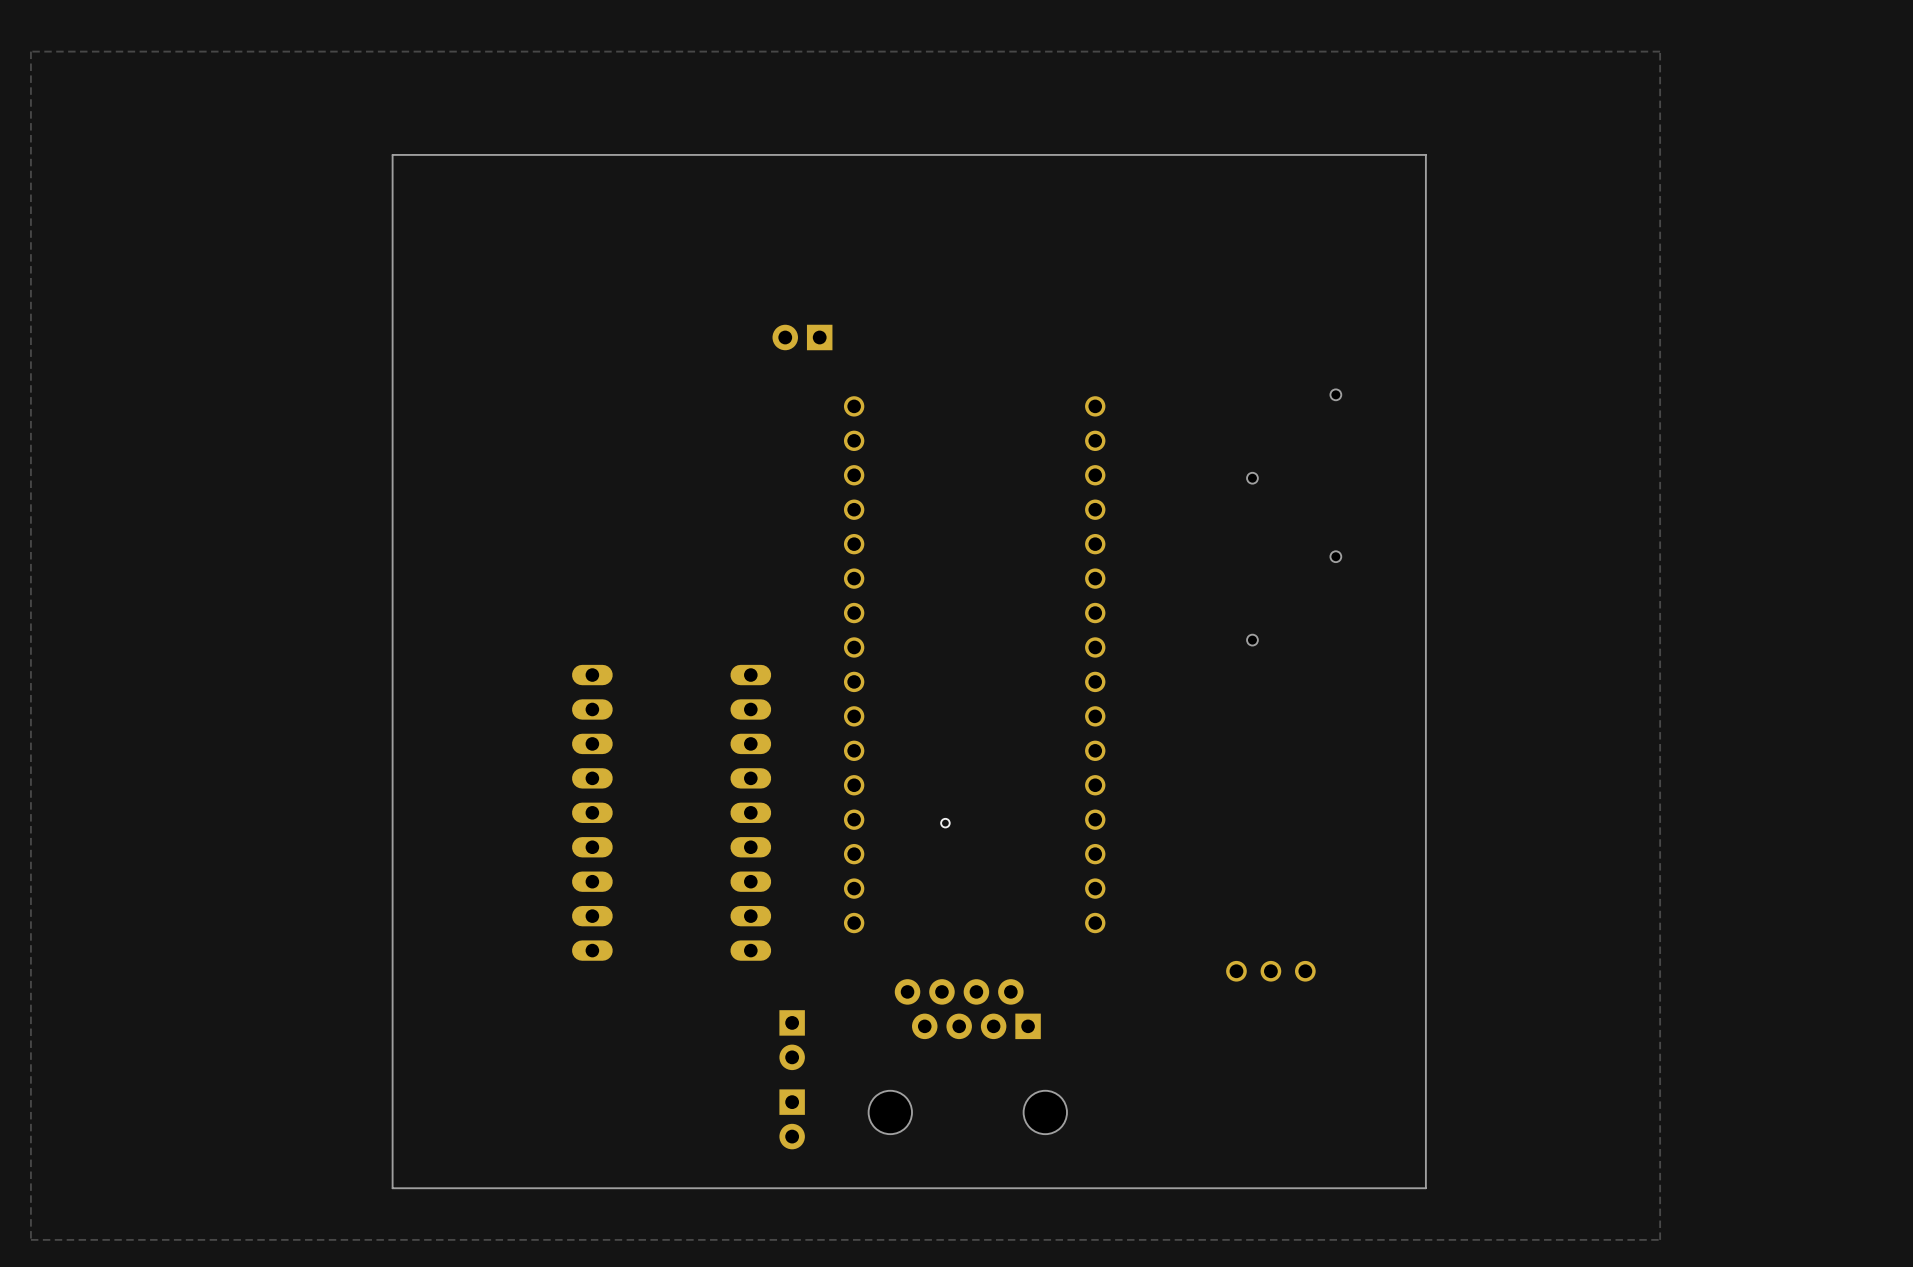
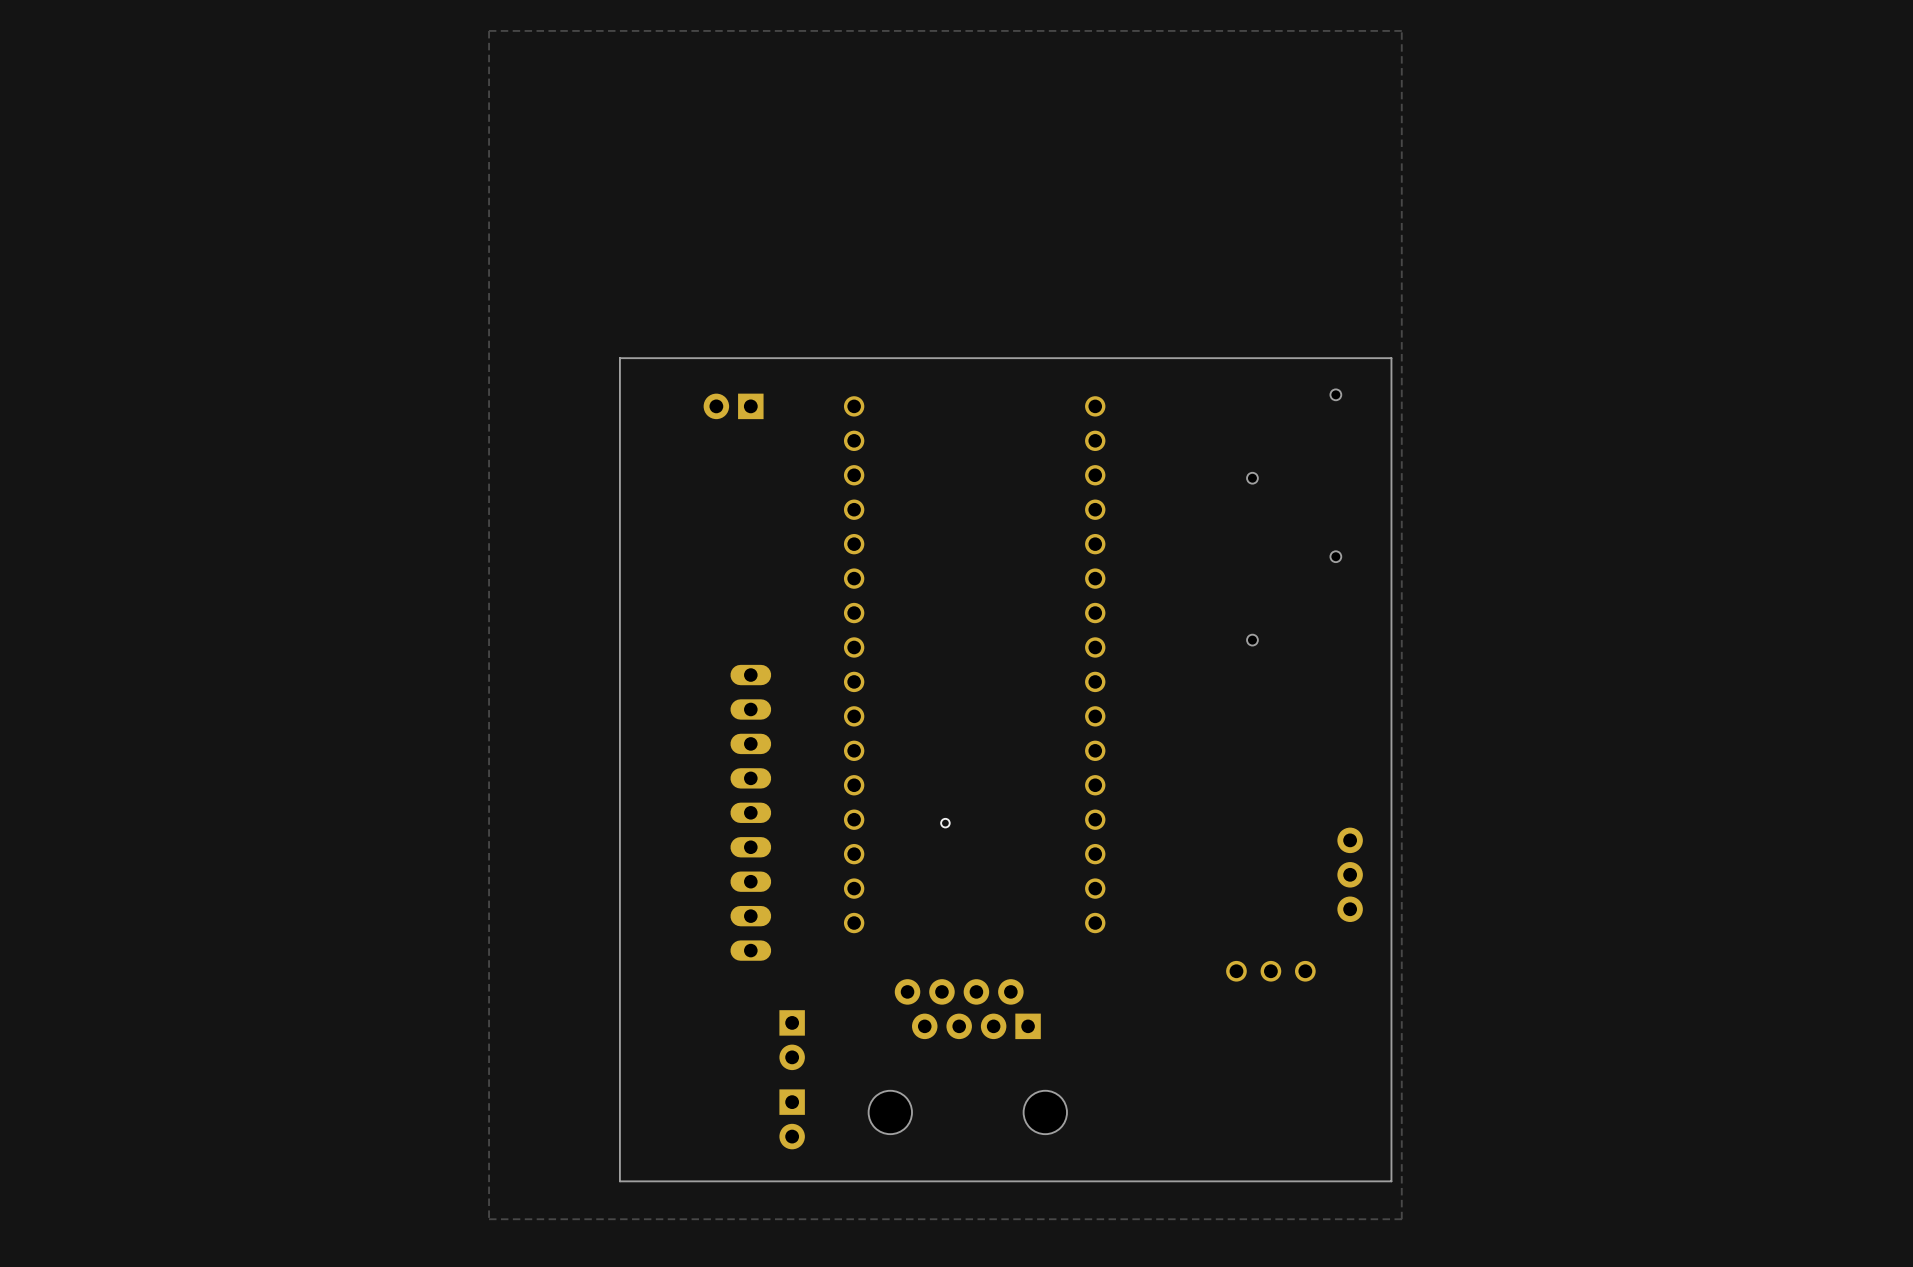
zone outline: (1660, 51) (1660, 1239) (30, 1239) (30, 51) (1660, 51) -> (1401, 30) (1401, 1219) (489, 1219) (489, 30) (1401, 30)
board edge: (1425, 154) (392, 154) (392, 1188) (1425, 1188) (1425, 154) -> (1391, 358) (1391, 1181) (619, 1181) (619, 358) (1391, 358)
part position: (802, 337) -> (733, 406)
part: (592, 812) -> none
part: none -> (1350, 874)

